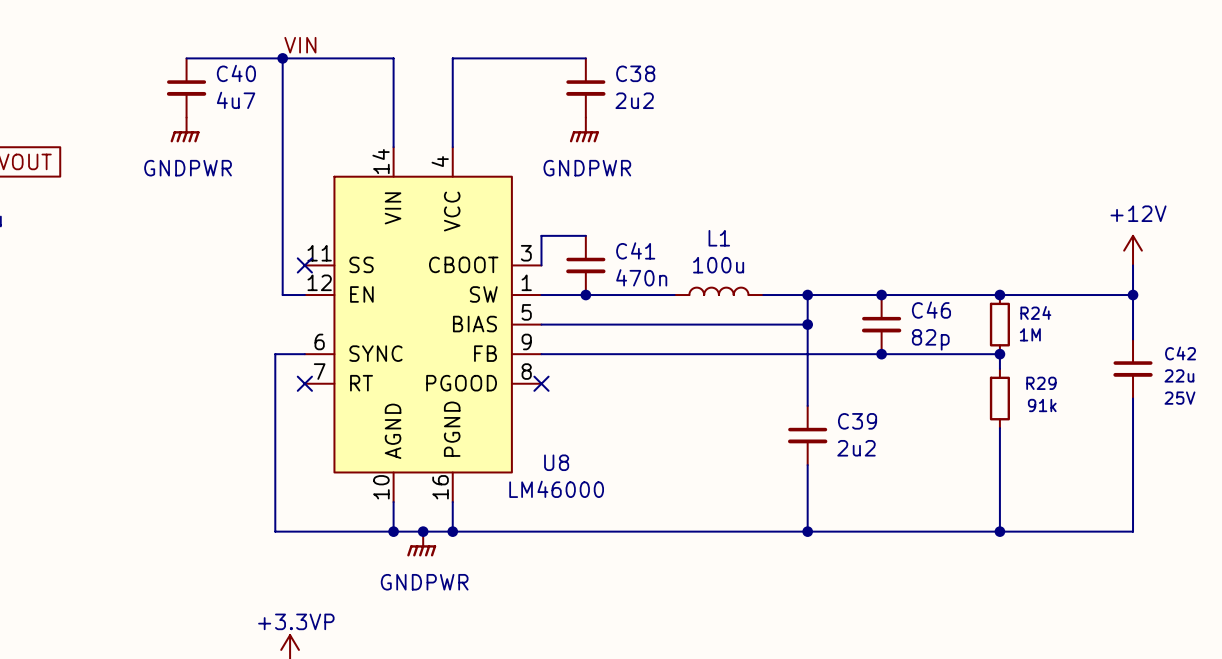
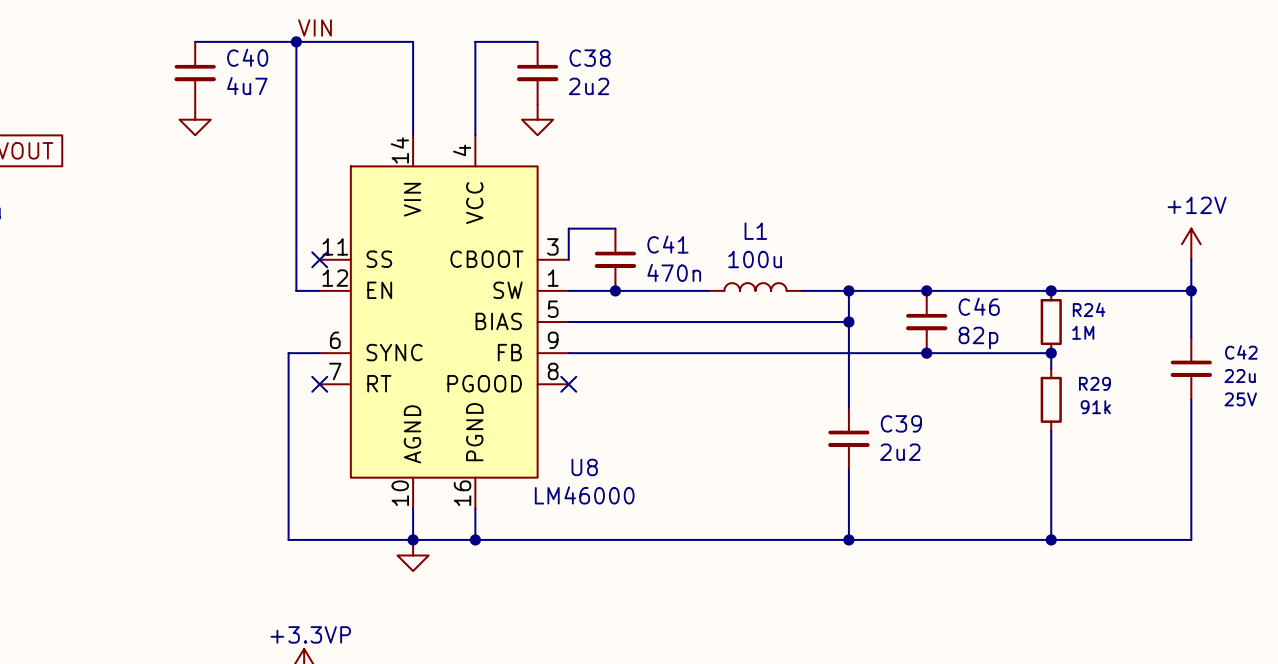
wire: (511, 58) (585, 58) -> none
C38 position: (585, 87) -> (537, 73)
power symbol shape: [170, 117, 200, 143] -> [179, 104, 211, 136]
power symbol: GNDPWR (584, 129) -> none
power symbol: none -> (537, 119)
power symbol text: GNDPWR (188, 168) -> none
junction: (423, 531) -> none
power symbol: GNDPWR (421, 544) -> none
power symbol: none -> (413, 555)

